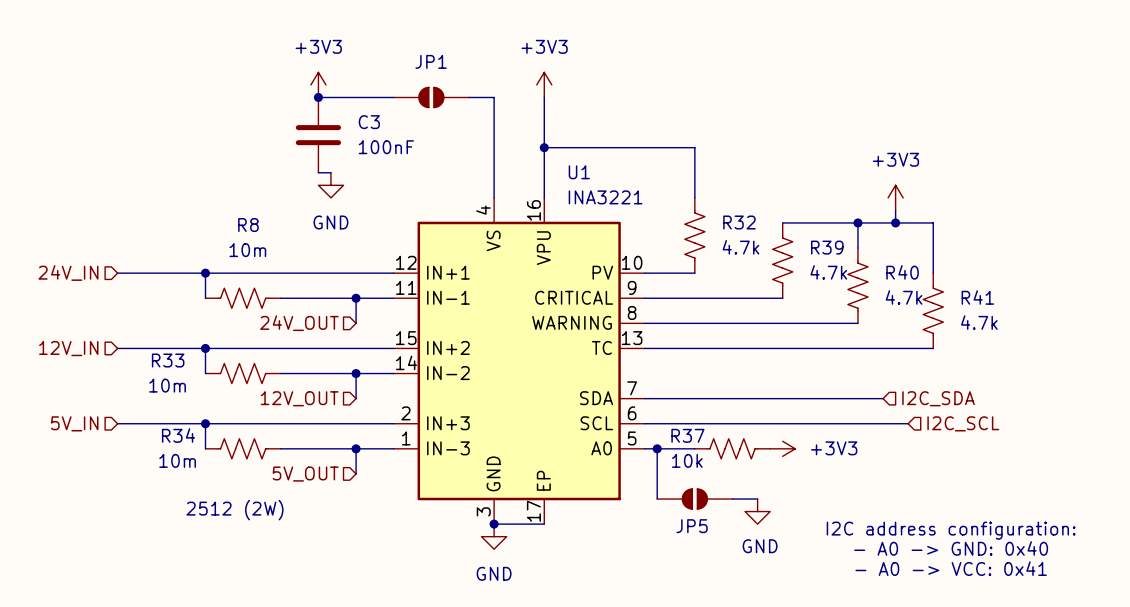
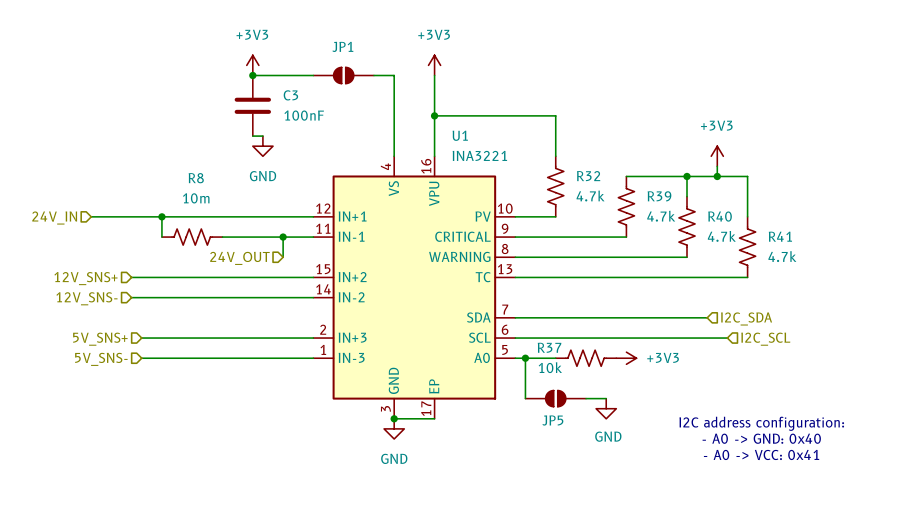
hierarchical label: 12V_IN (68, 348) -> none
hierarchical label: none -> 12V_SNS+ (85, 278)
wire: (117, 348) (167, 348) -> none
wire: (205, 348) (205, 373) -> none
junction: (205, 348) -> none
hierarchical label: none -> 12V_SNS- (86, 298)
wire: none -> (131, 297) (222, 297)
R33: 10m (243, 373) -> none
wire: (356, 373) (356, 398) -> none
junction: (356, 373) -> none
hierarchical label: 12V_OUT (299, 398) -> none
hierarchical label: 5V_IN (74, 423) -> none
wire: (117, 423) (180, 423) -> none
hierarchical label: none -> 5V_SNS+ (100, 339)
wire: (205, 423) (205, 448) -> none
junction: (205, 423) -> none
hierarchical label: none -> 5V_SNS- (101, 359)
wire: none -> (141, 358) (222, 358)
R34: 10m (243, 448) -> none
wire: (356, 448) (356, 473) -> none
junction: (356, 448) -> none
hierarchical label: 5V_OUT (305, 474) -> none
text: 2512 (2W) (235, 510) -> none

